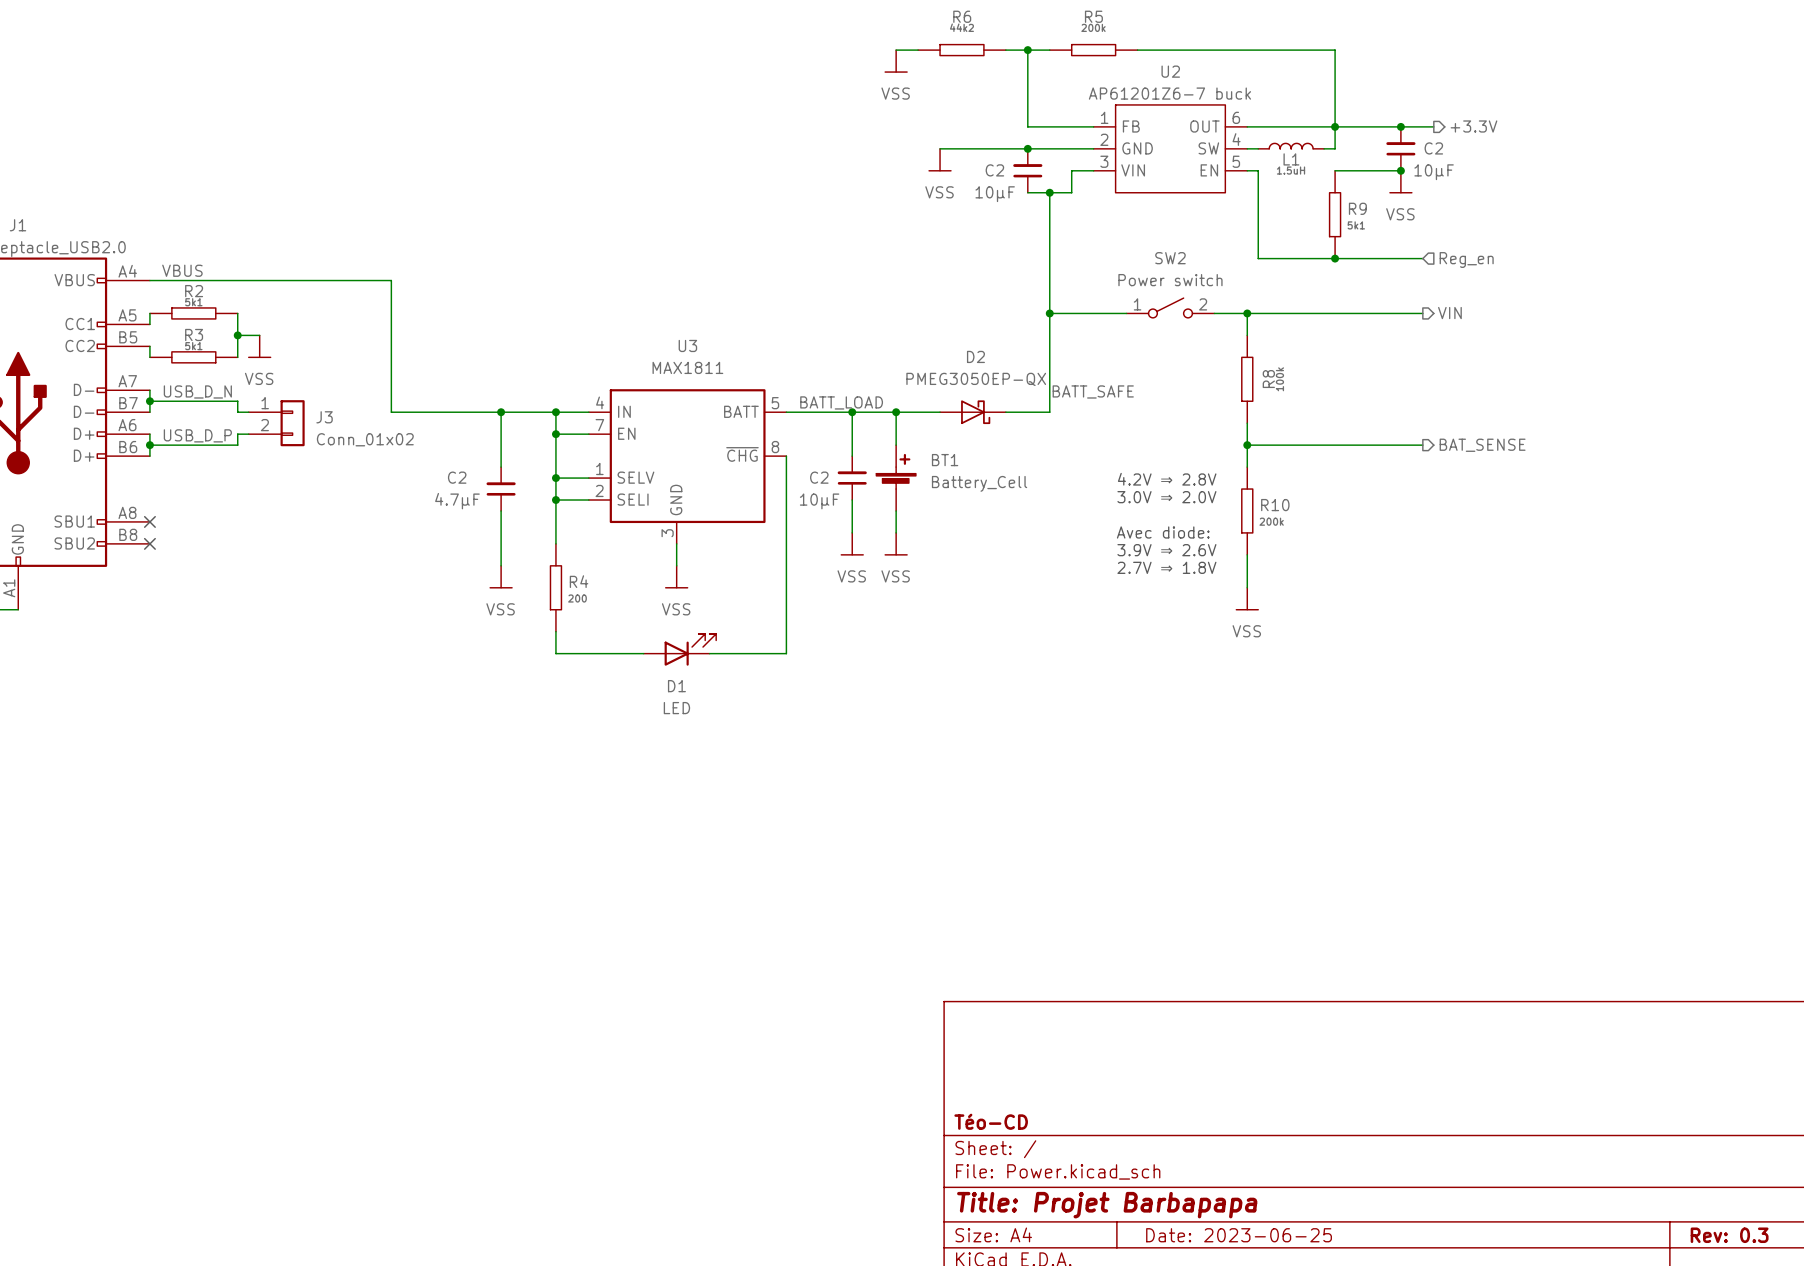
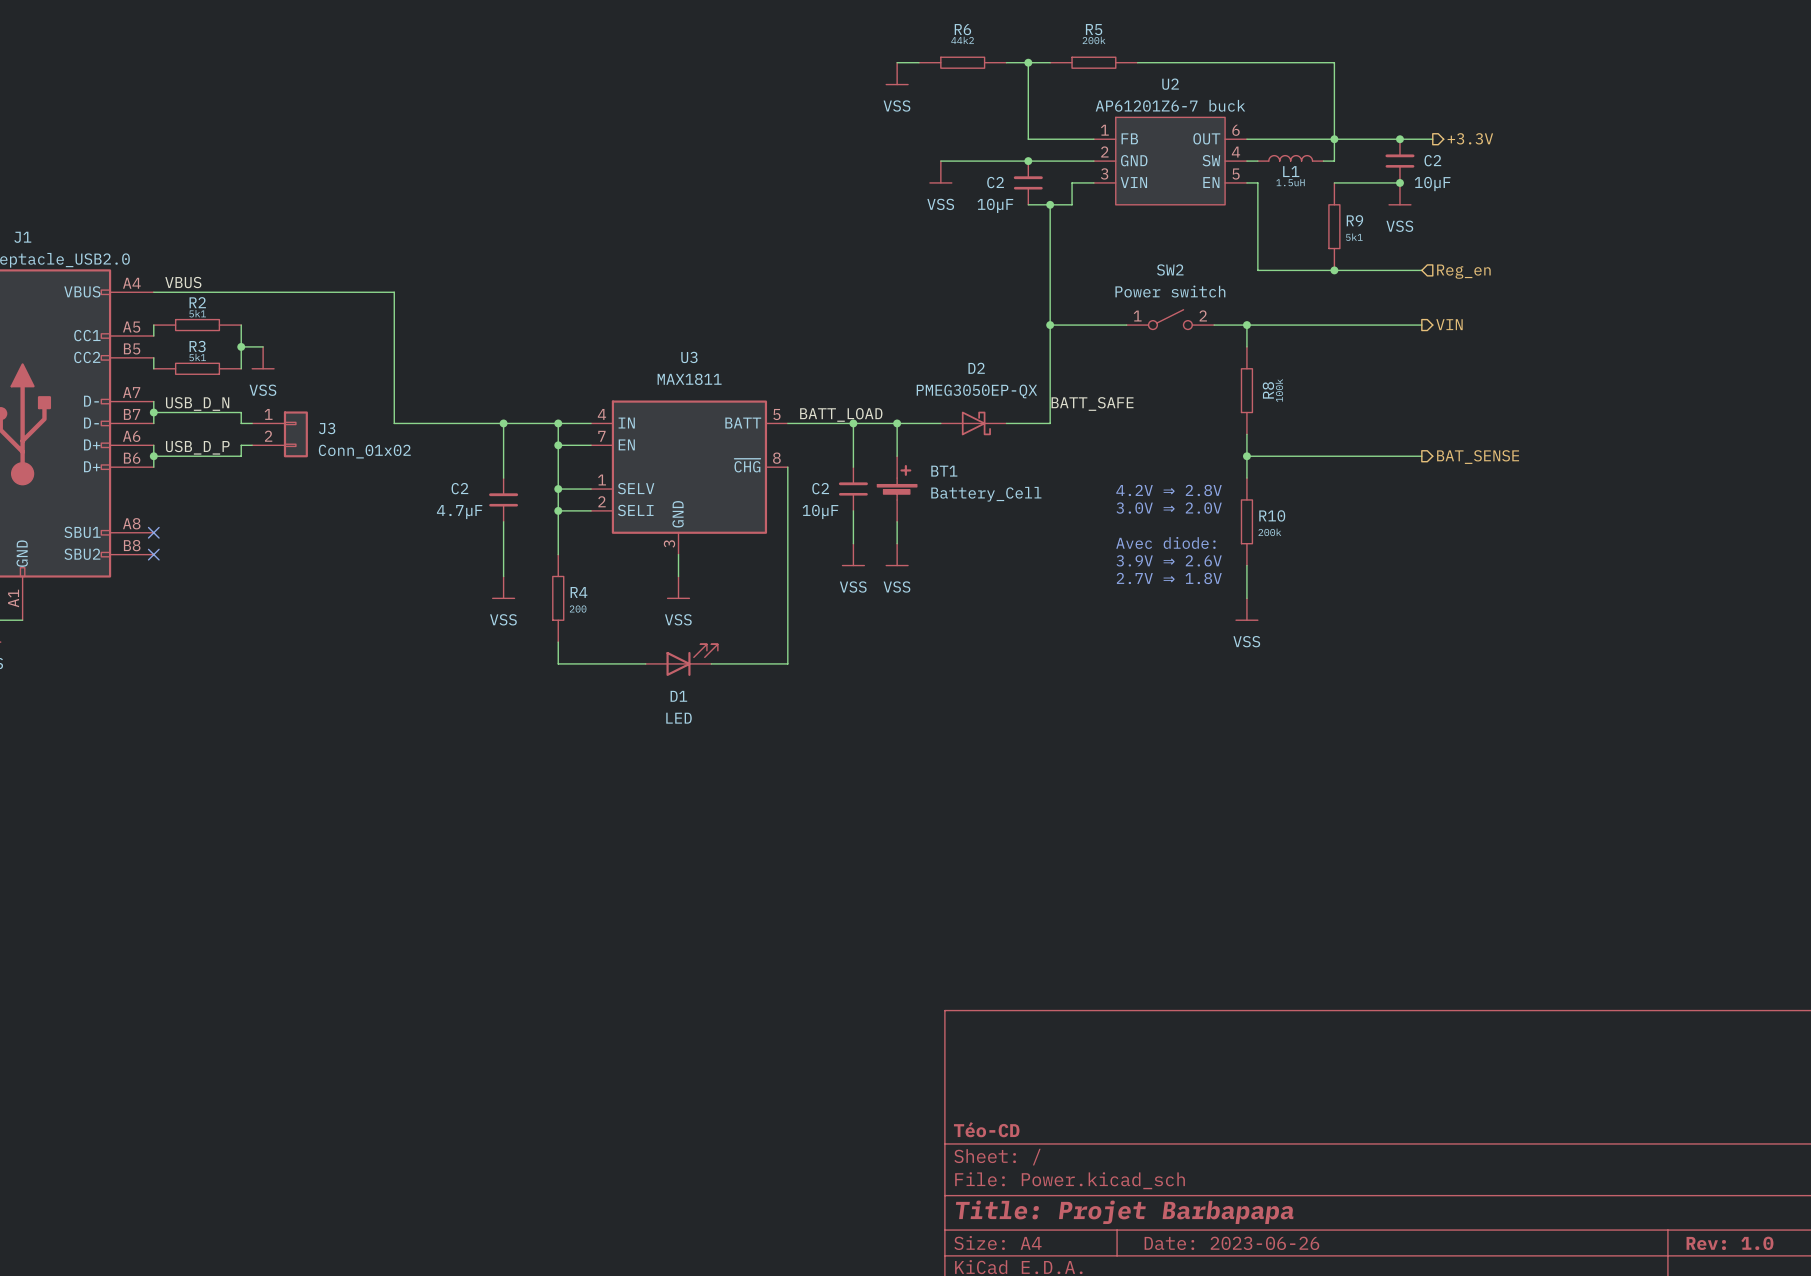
title block: Date: 2023-06-25 (1239, 1235) -> Date: 2023-06-26 (1231, 1243)
title block: Rev: 0.3 (1729, 1235) -> Rev: 1.0 (1730, 1243)

